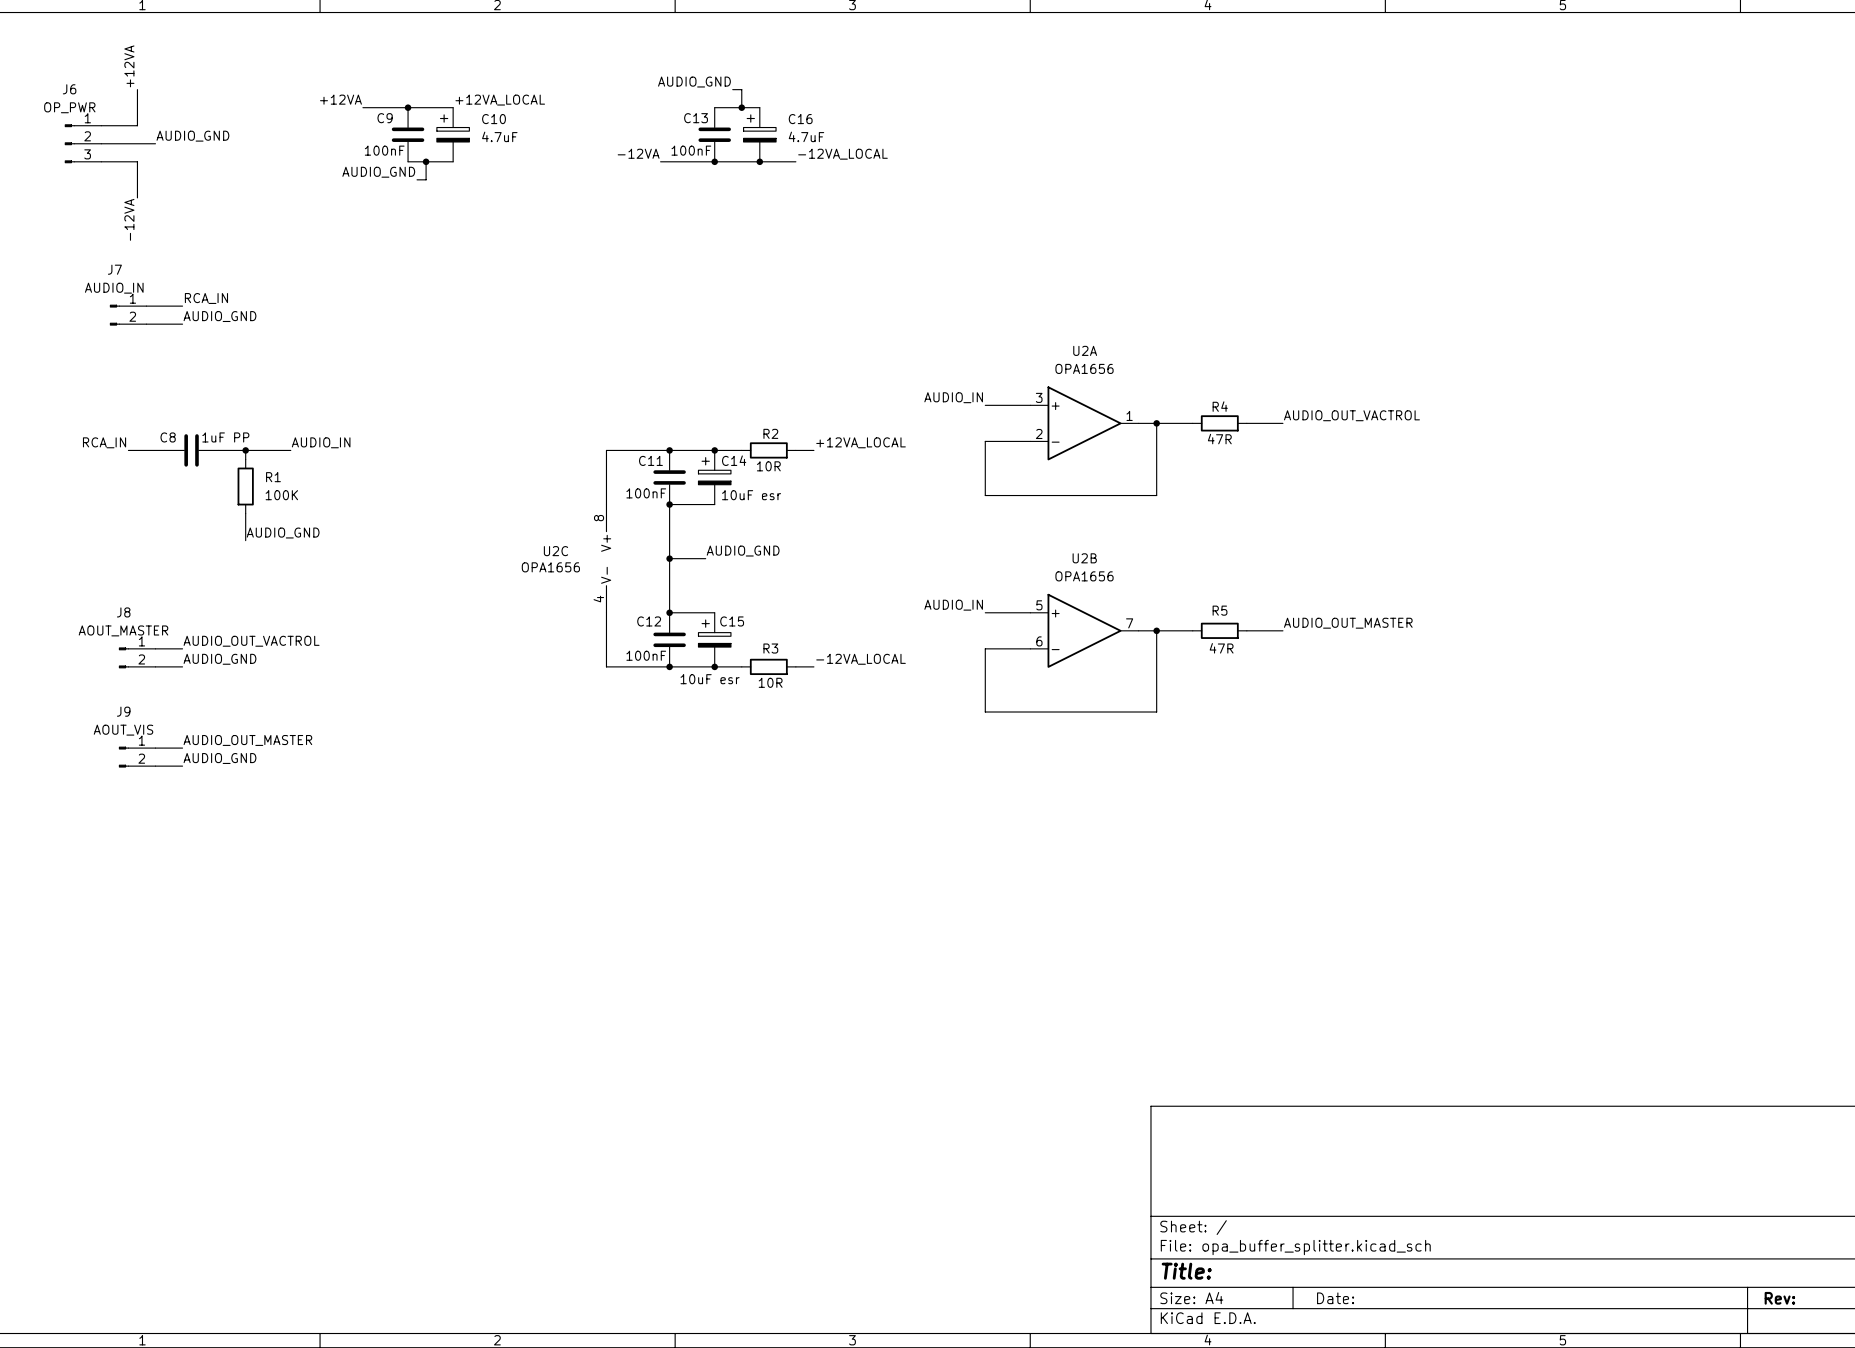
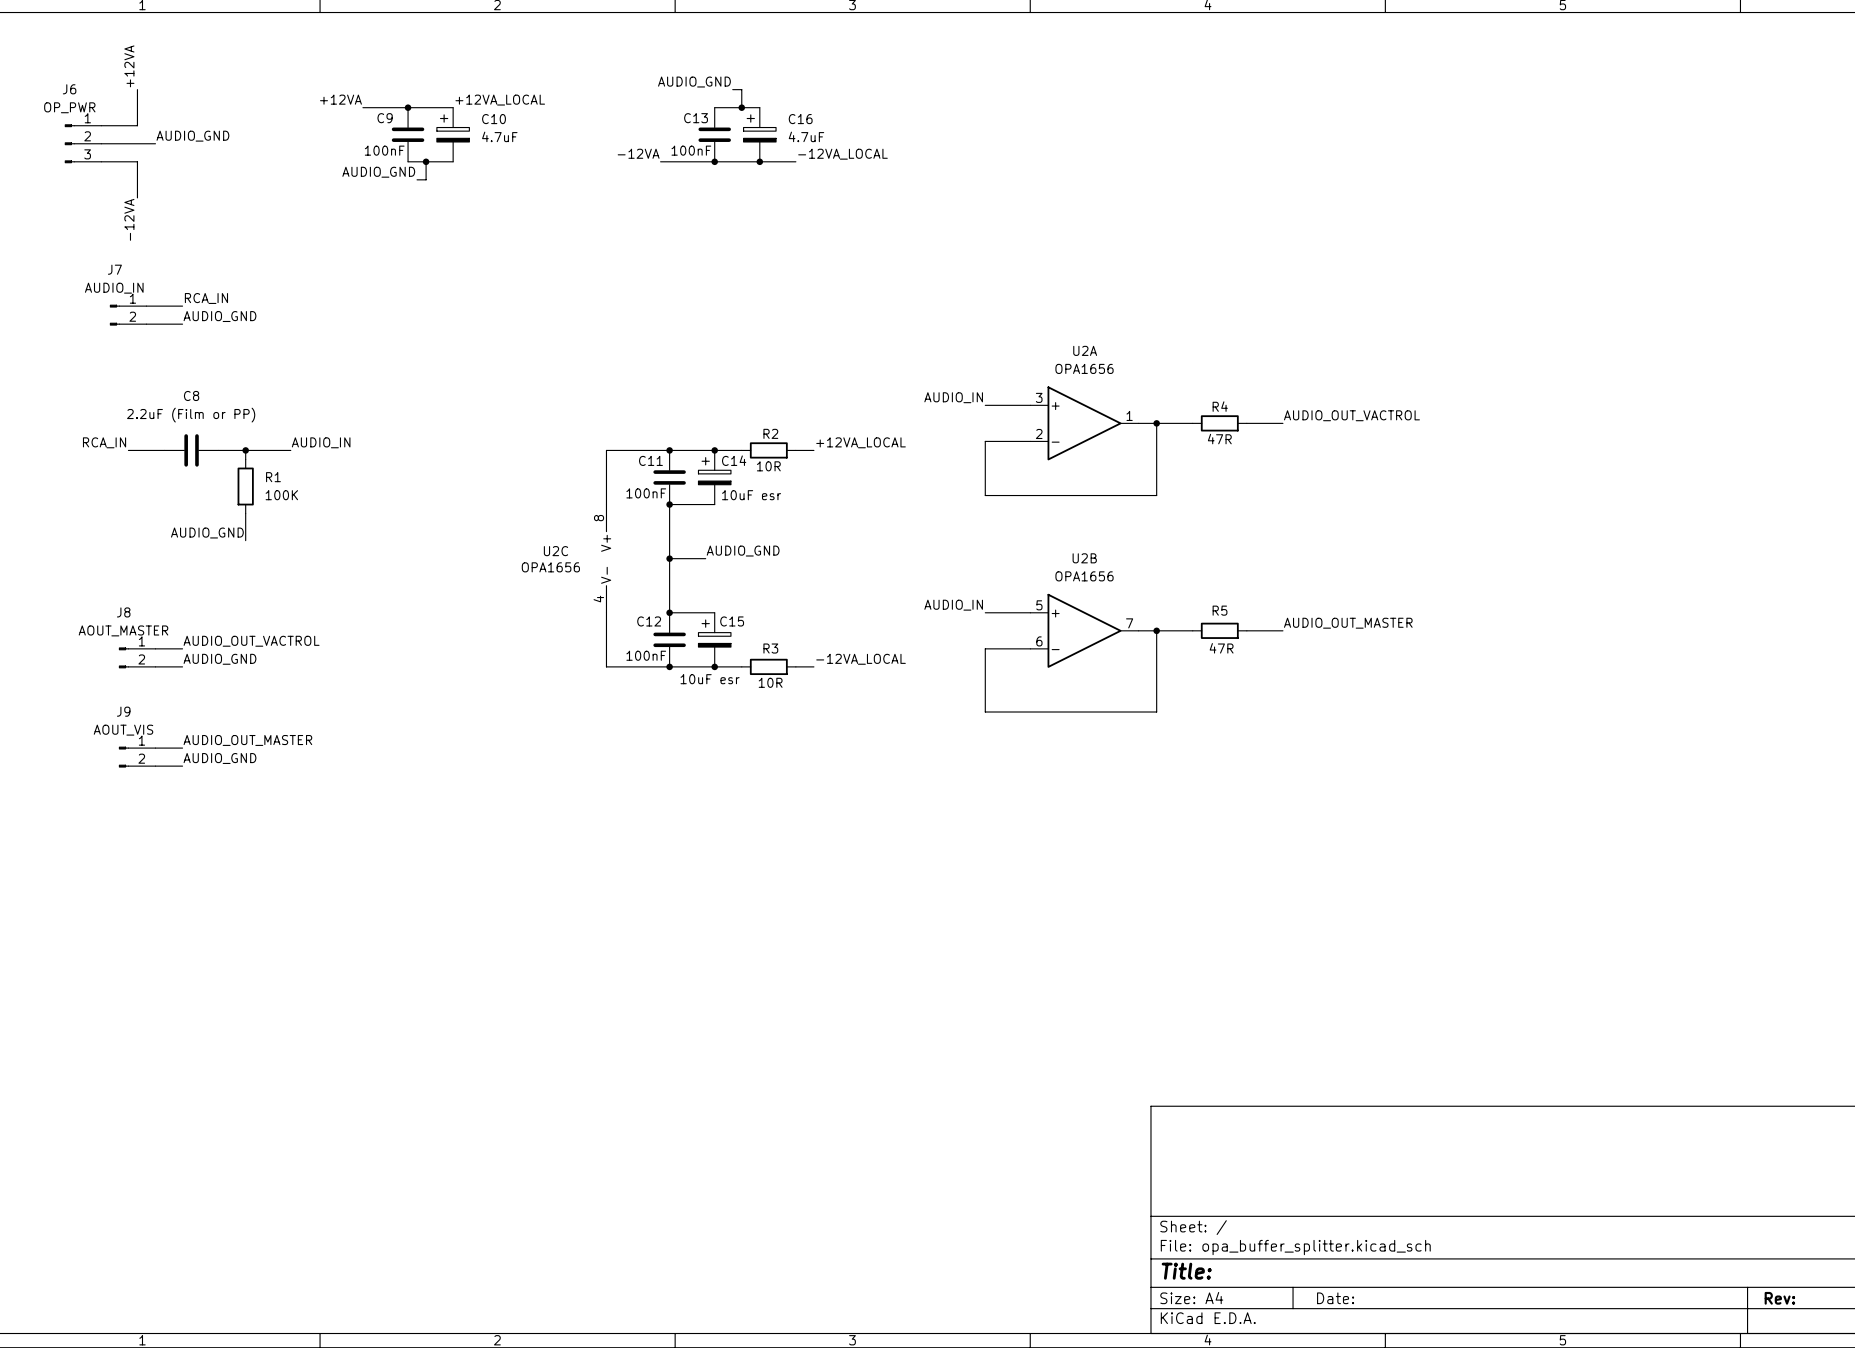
C8 name position: C8 (168, 437) -> C8 (191, 395)
C8 value: 1uF PP (225, 437) -> 2.2uF (Film or PP) (191, 415)
label position: AUDIO_GND (283, 533) -> AUDIO_GND (207, 533)

